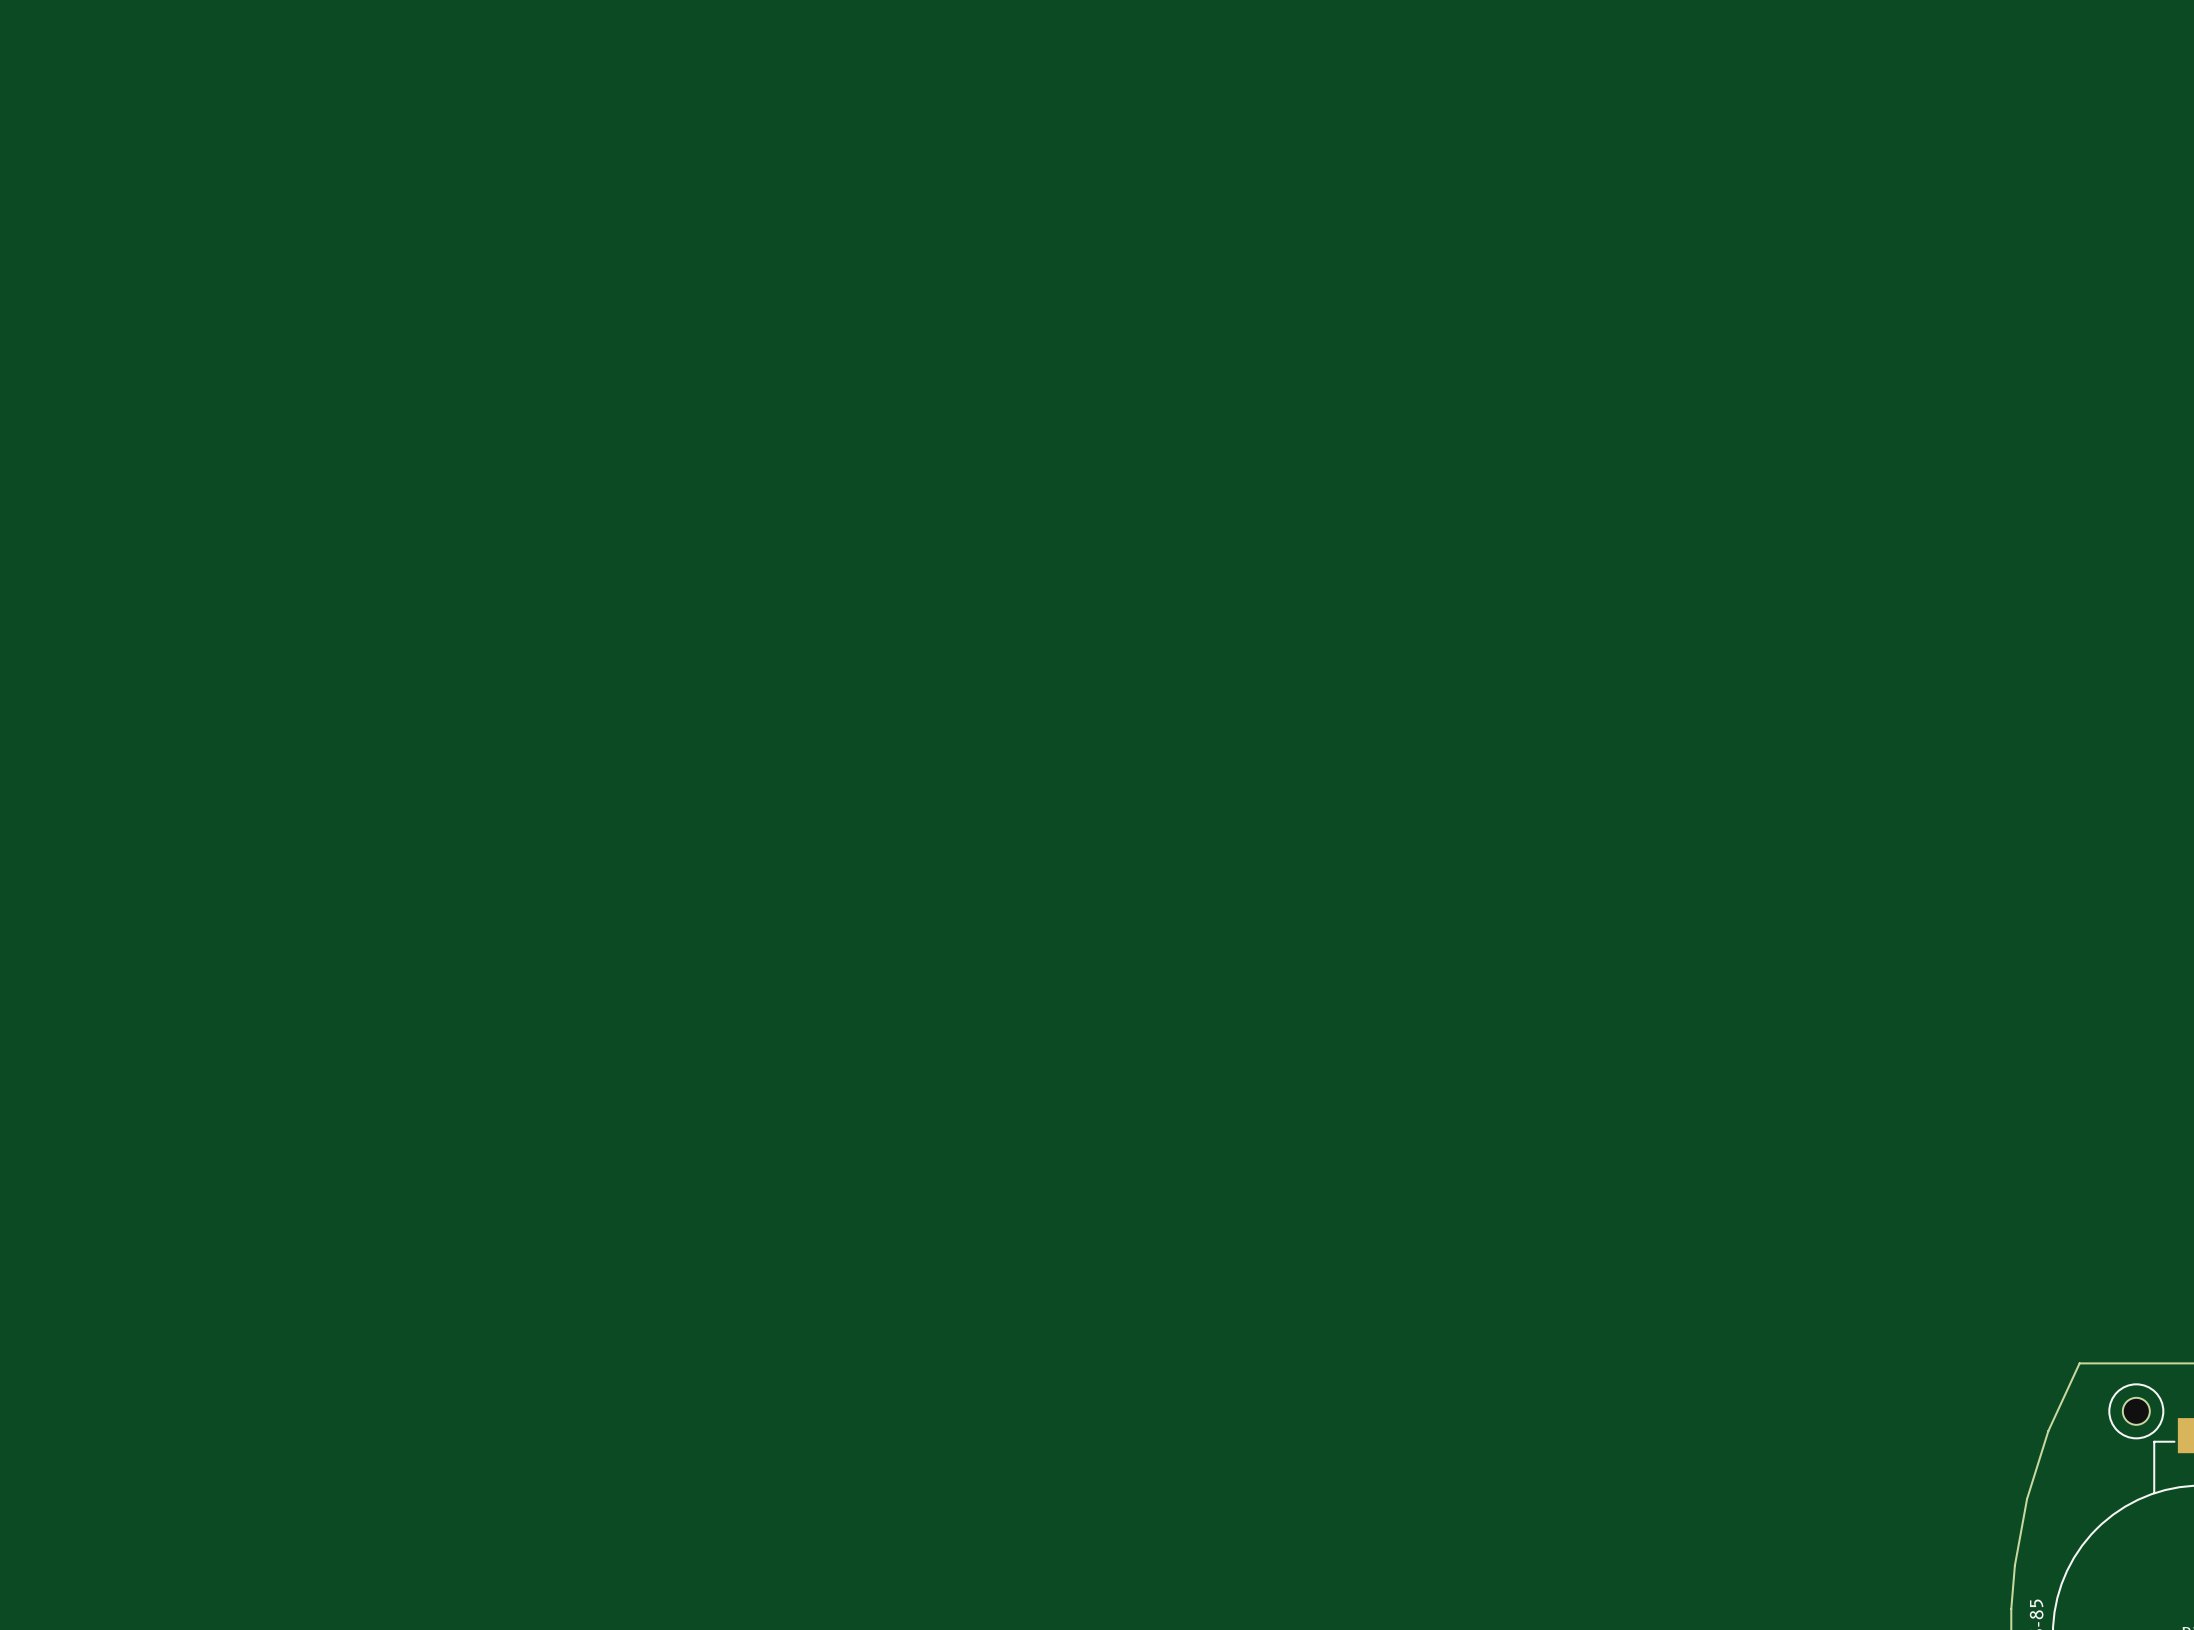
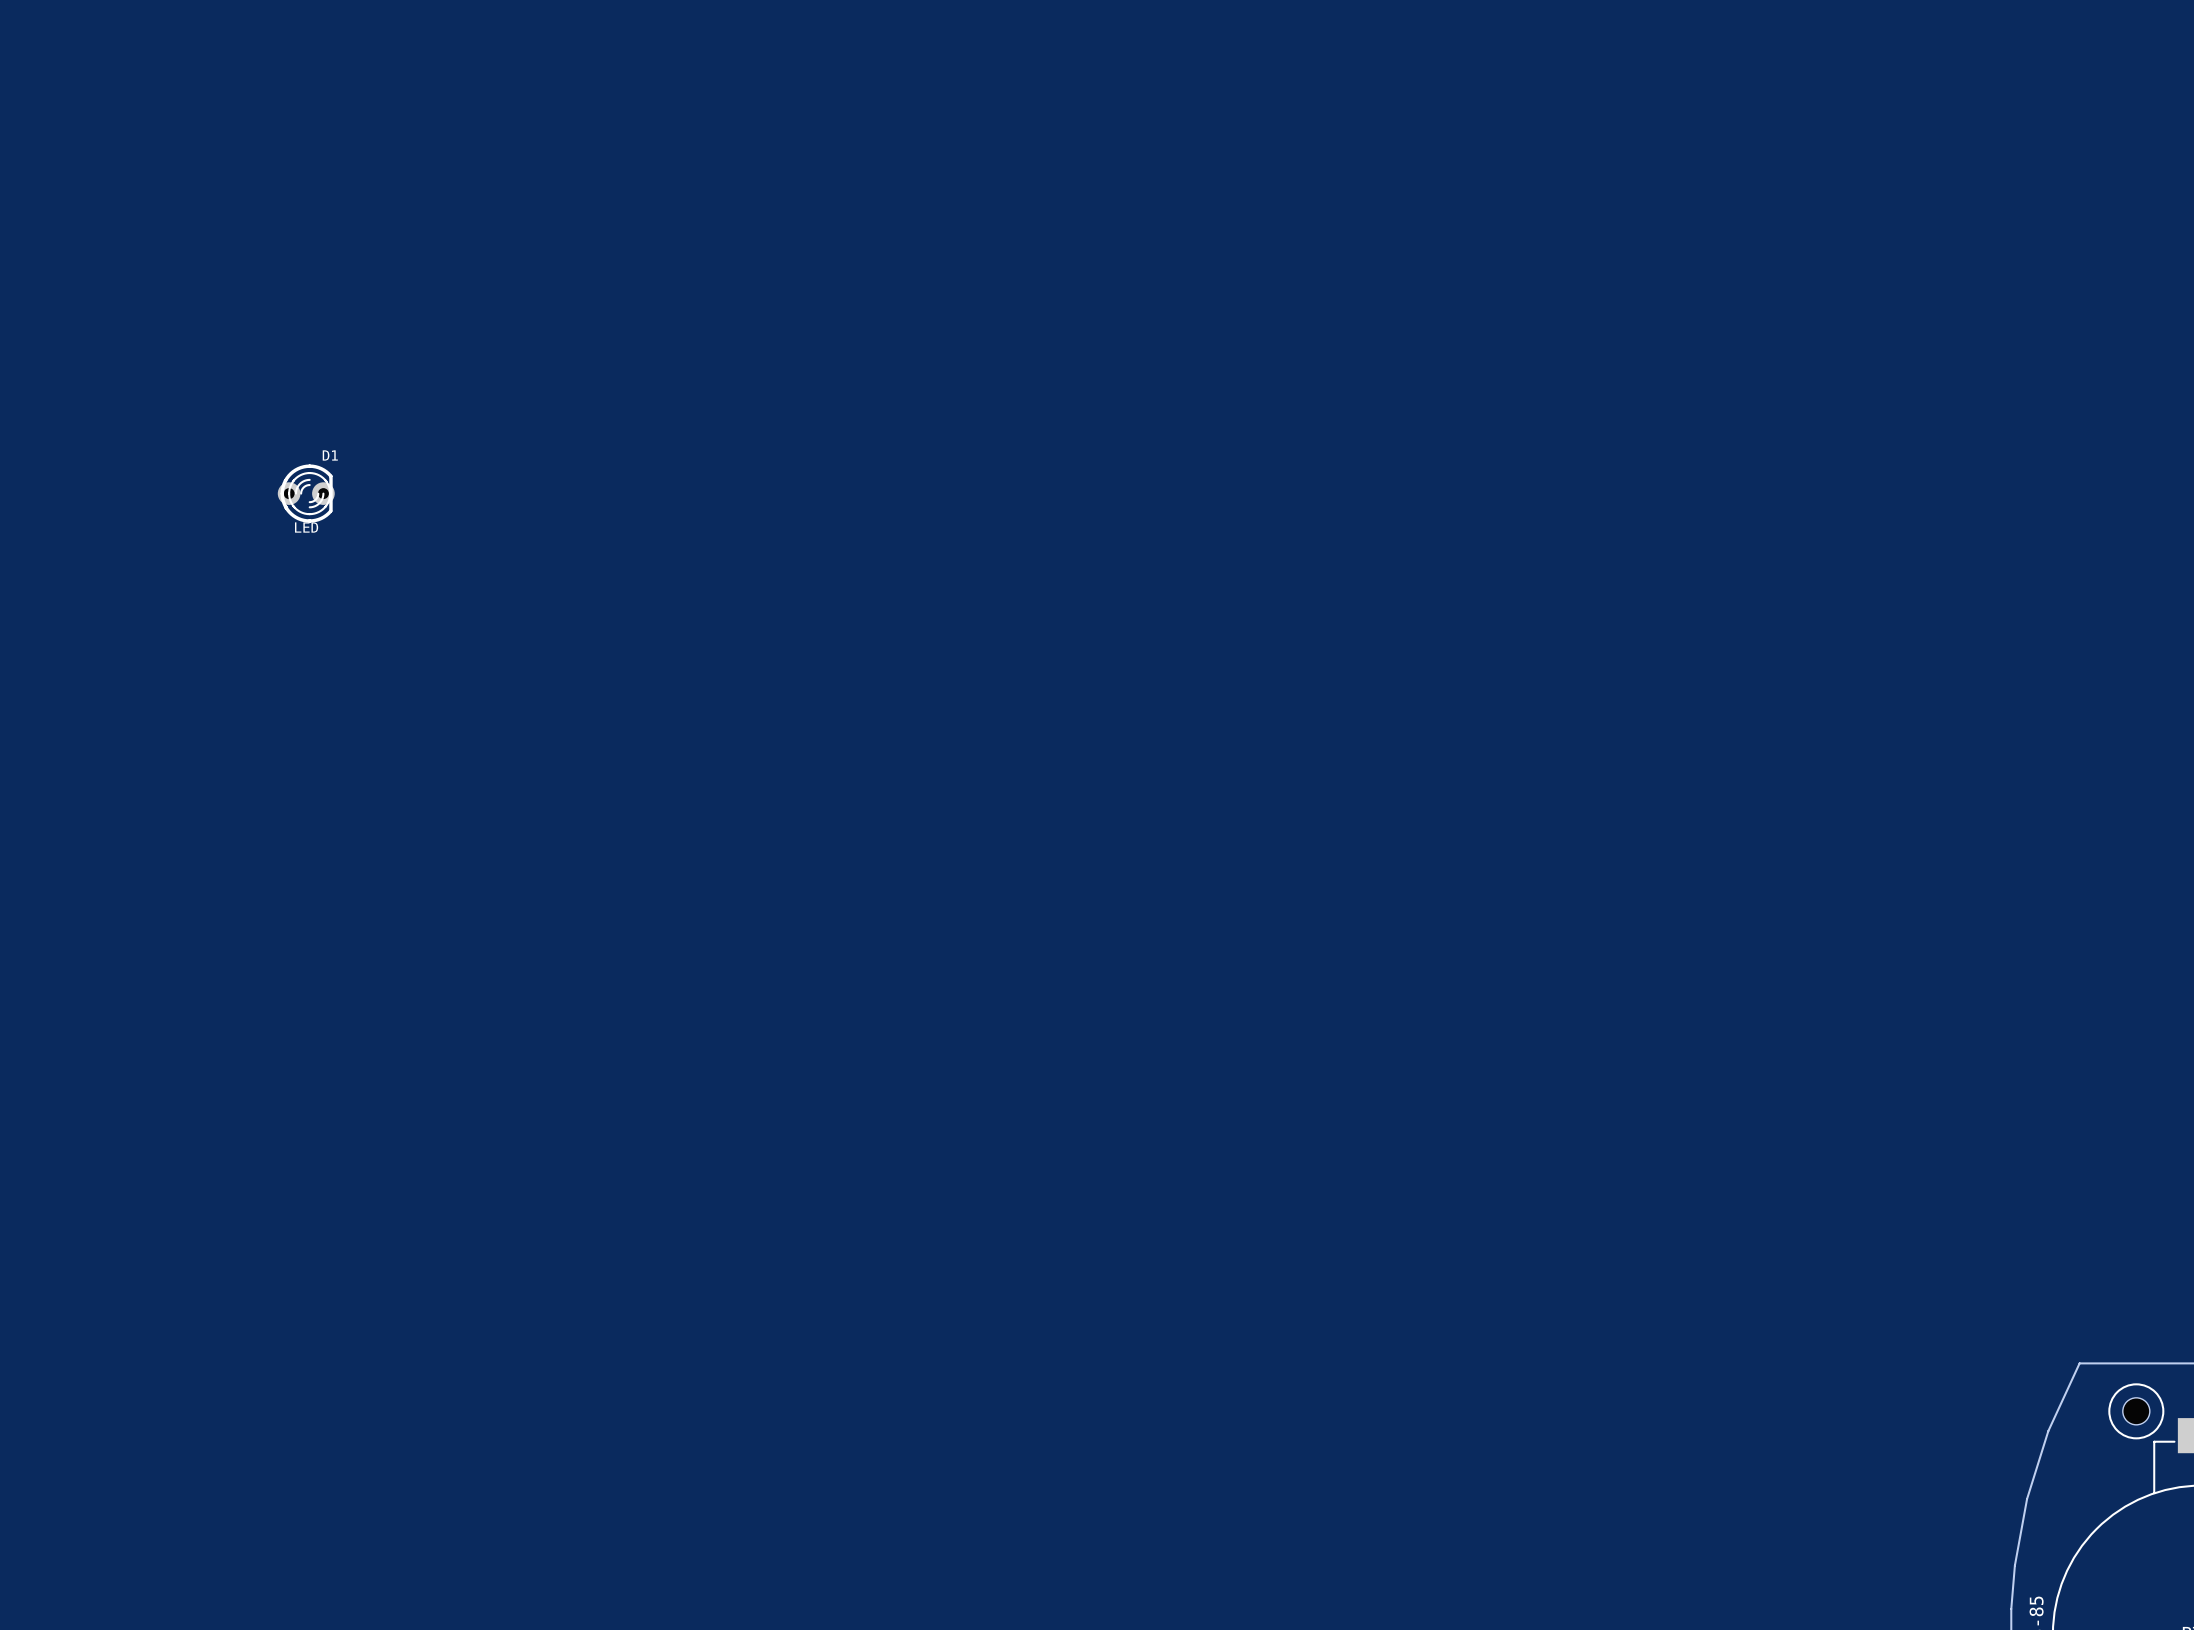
D1: none -> LED (306, 493)

